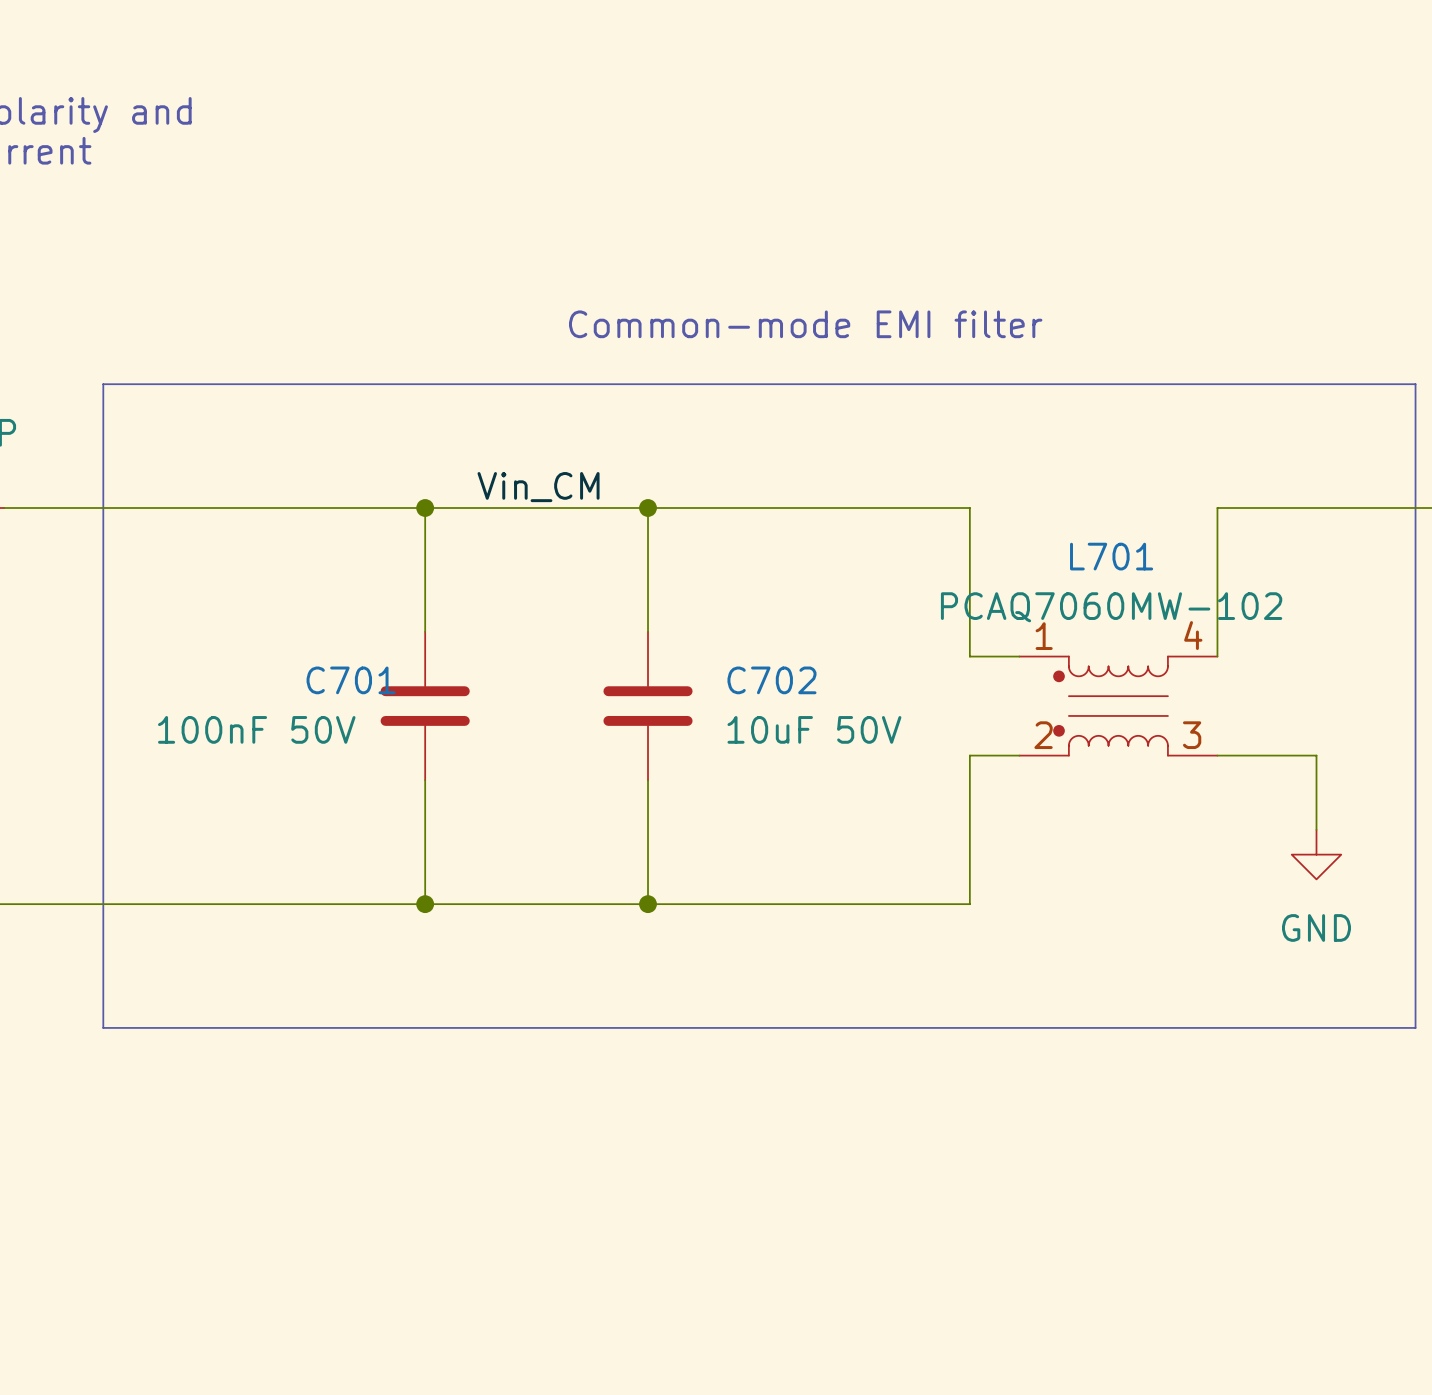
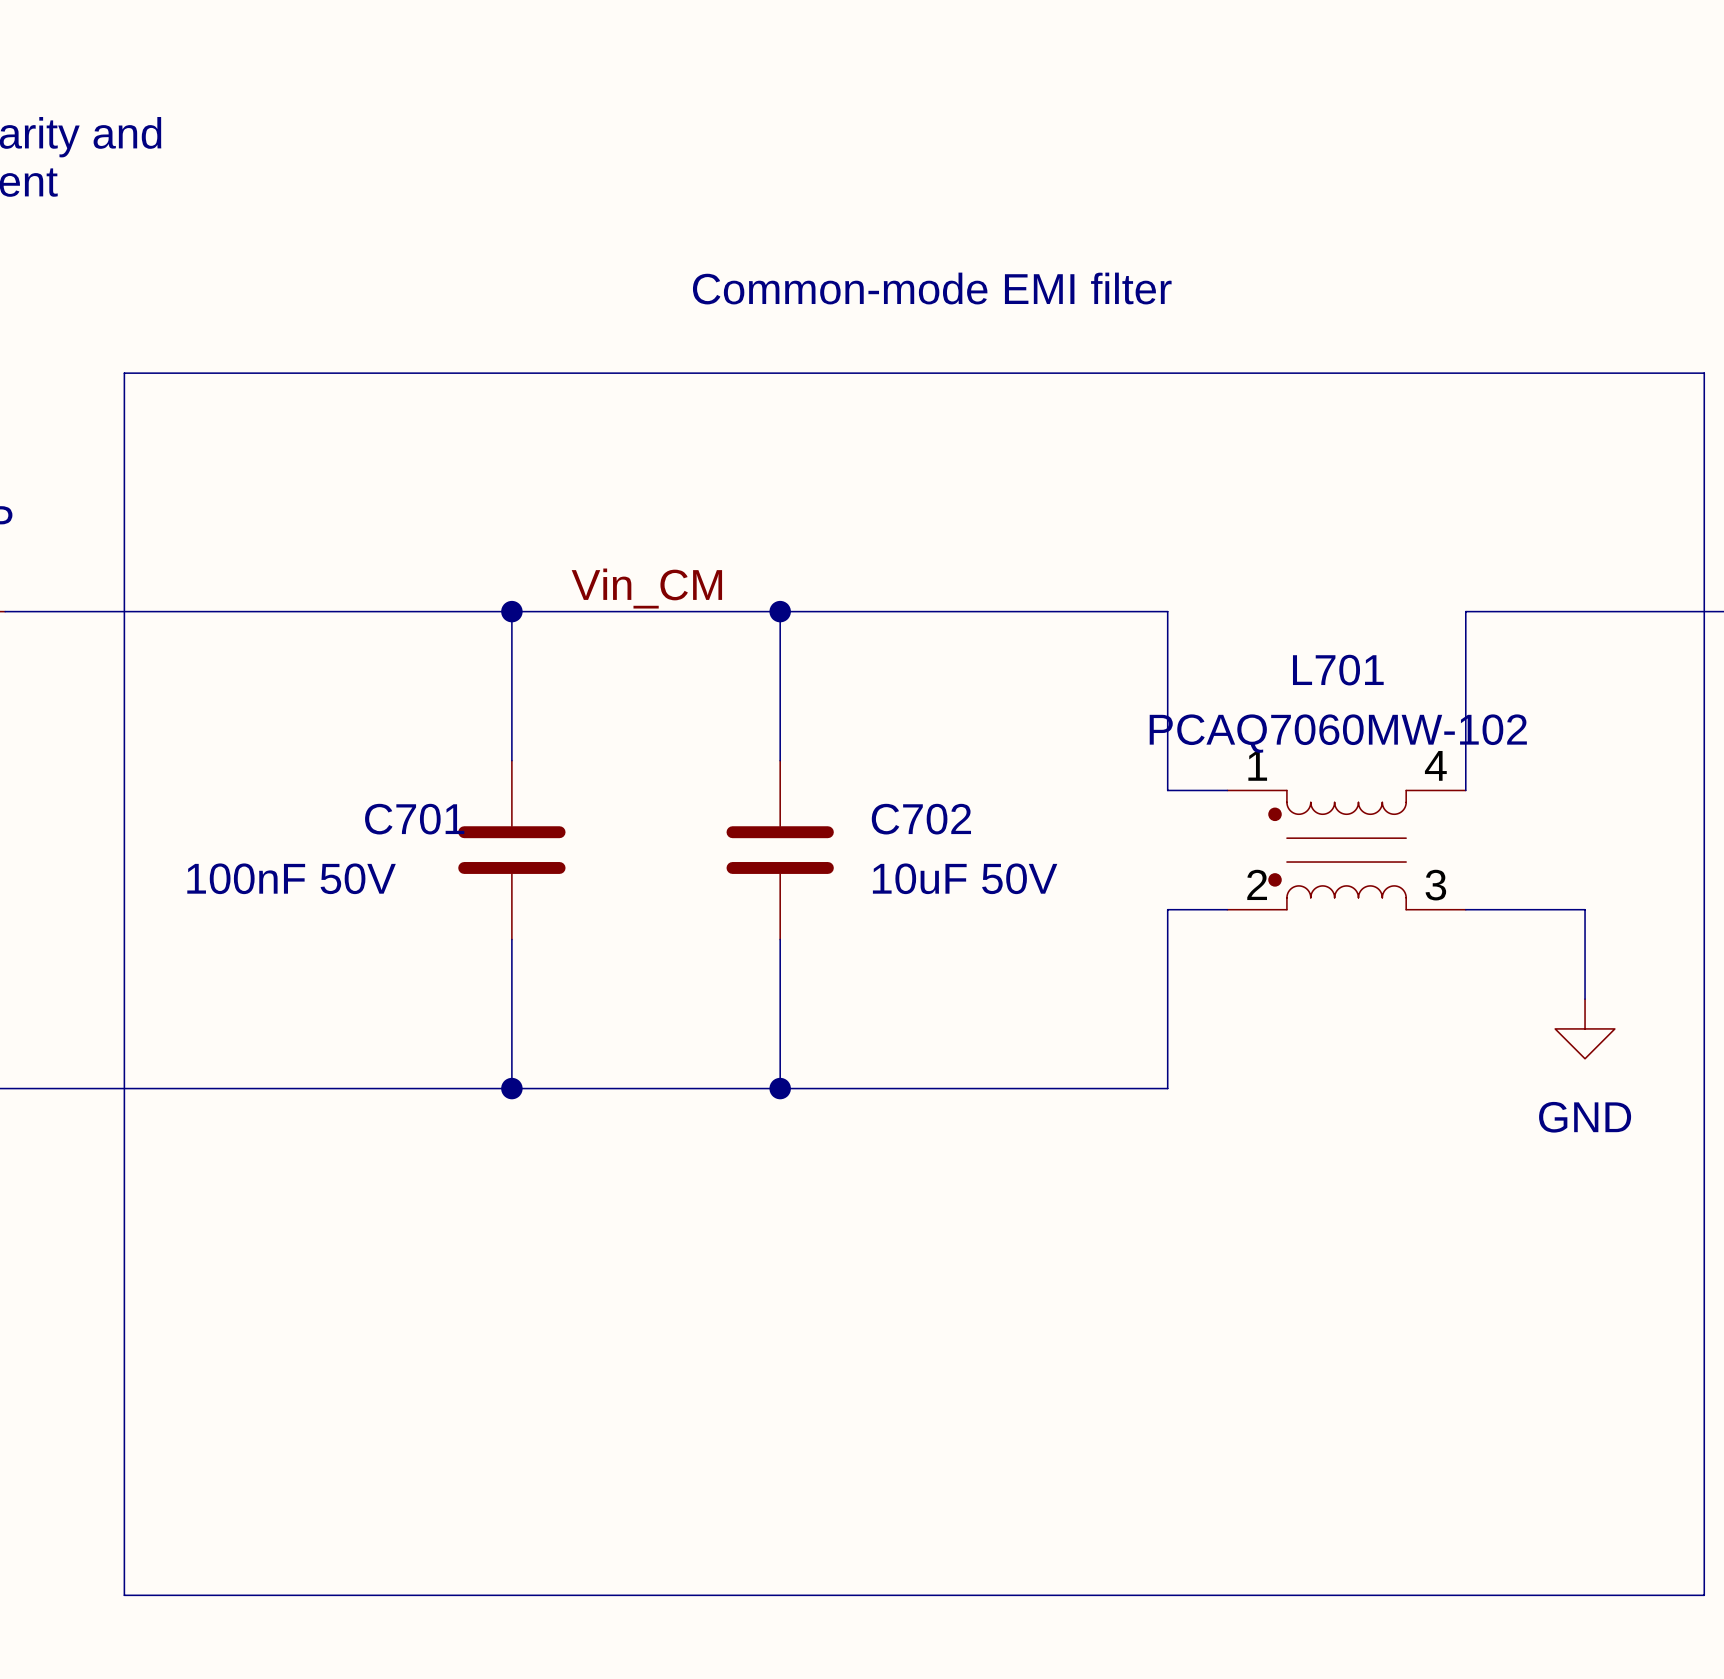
text position: Common-mode EMI filter (805, 324) -> Common-mode EMI filter (932, 288)
line: (103, 384) (1415, 384) -> (124, 462) (124, 373) (1704, 373) (1704, 462)
line: (103, 1027) (1415, 1027) -> (124, 1237) (124, 1595) (1704, 1595) (1704, 1237)

